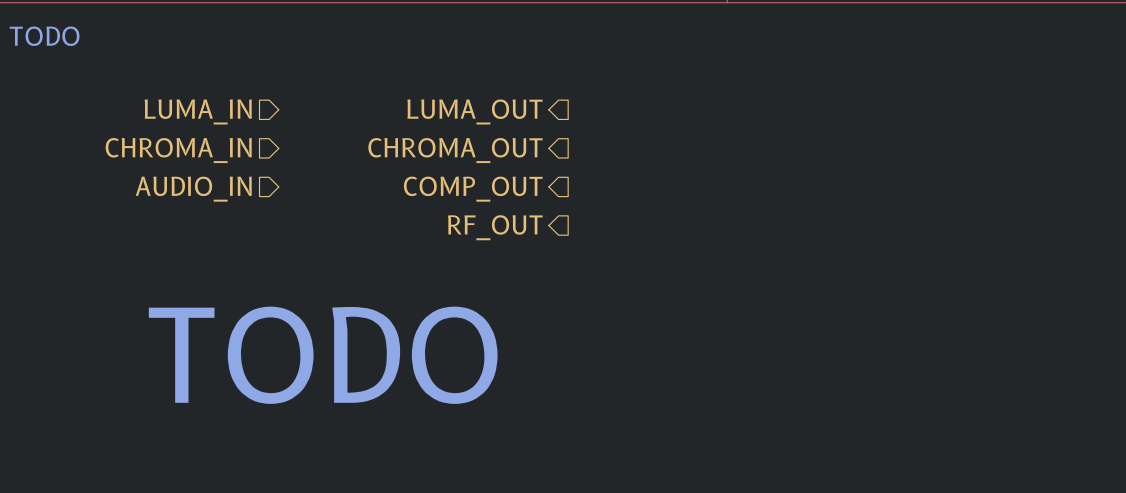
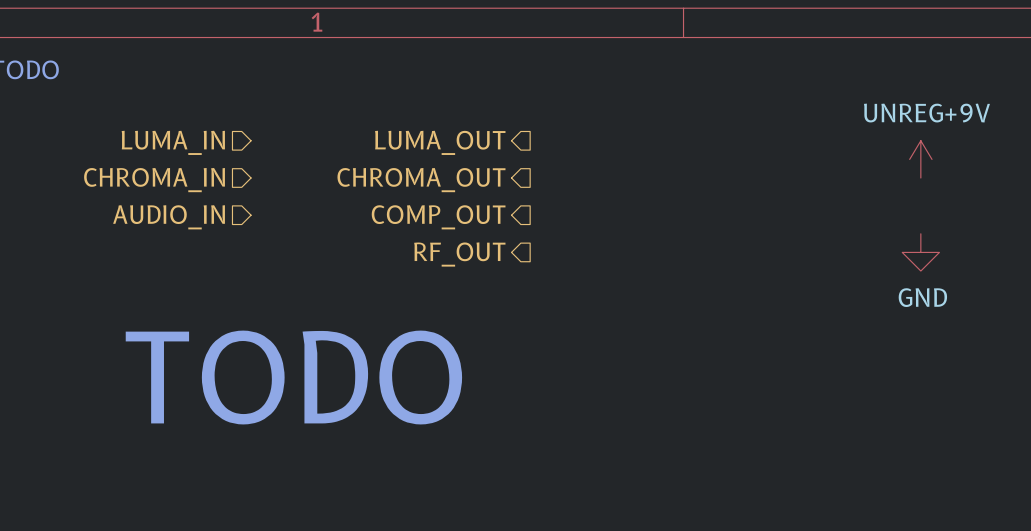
power symbol: none -> UNREG+9V (920, 159)
power symbol: none -> GND (920, 252)

